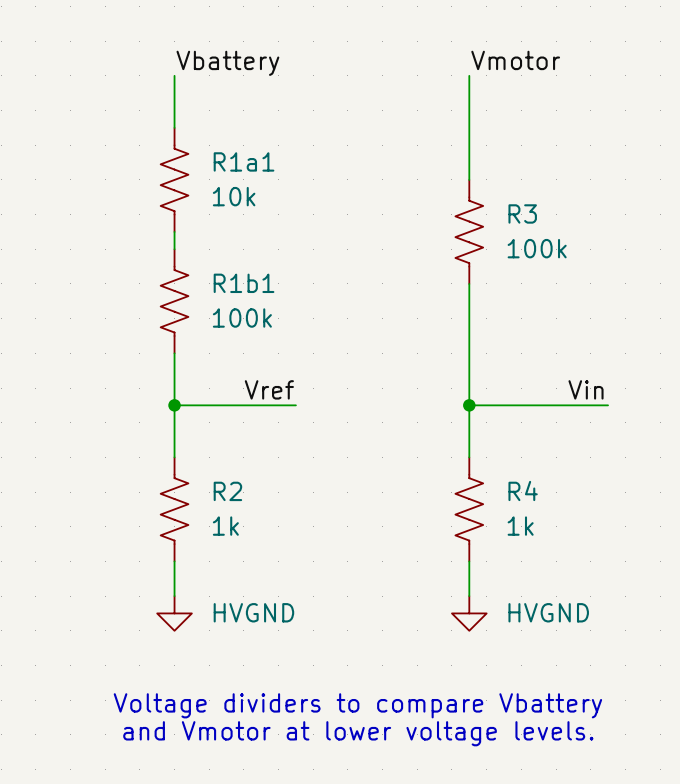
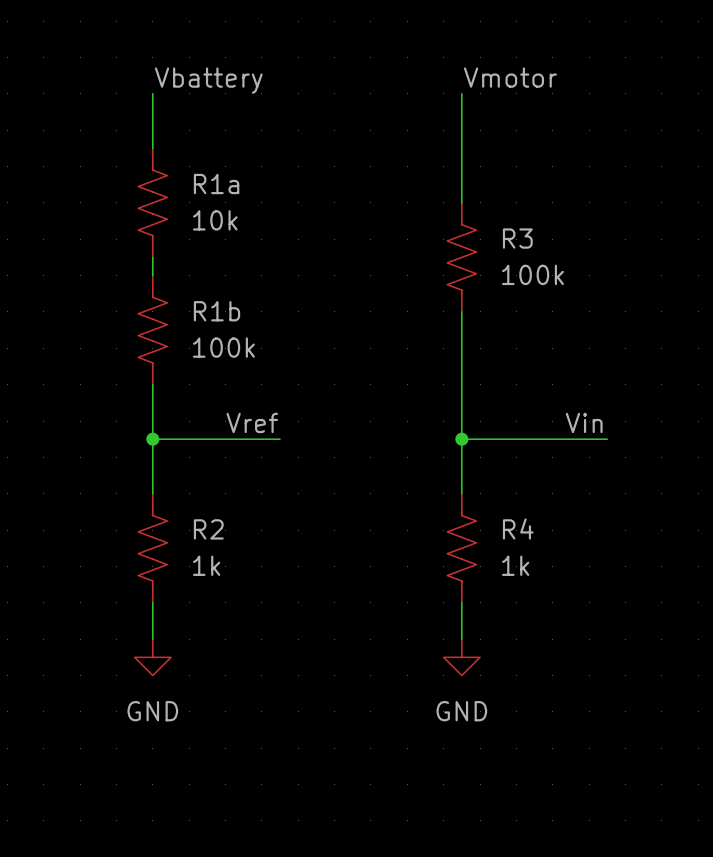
R1a1 name: R1a1 (244, 161) -> R1a (216, 184)
R1b1 name: R1b1 (244, 283) -> R1b (217, 311)
power symbol: HVGND (174, 613) -> GND (152, 657)
power symbol: HVGND (469, 613) -> GND (461, 657)
text: Voltage dividers to compare Vbattery (357, 705) -> none
text: and Vmotor at lower voltage levels. (358, 733) -> none

